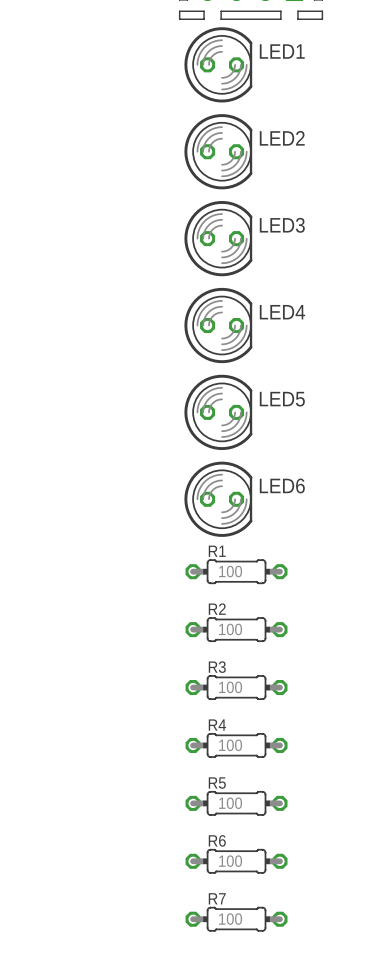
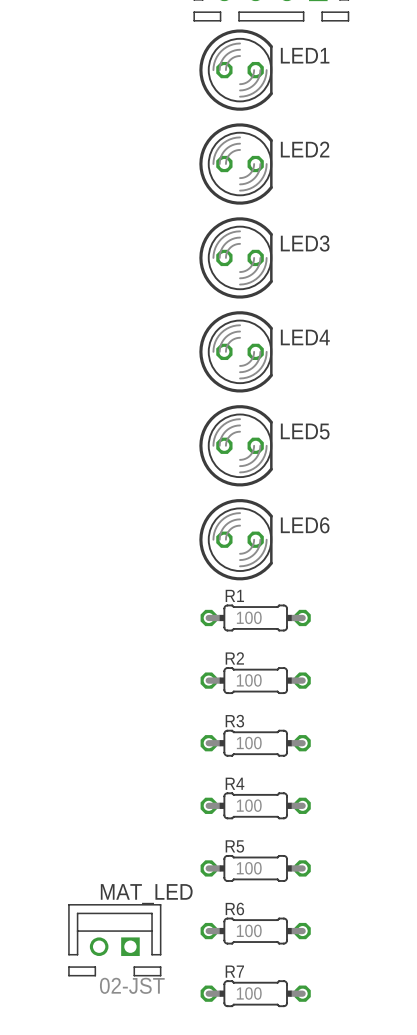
MAT_LED: none -> 02-JST (114, 940)

